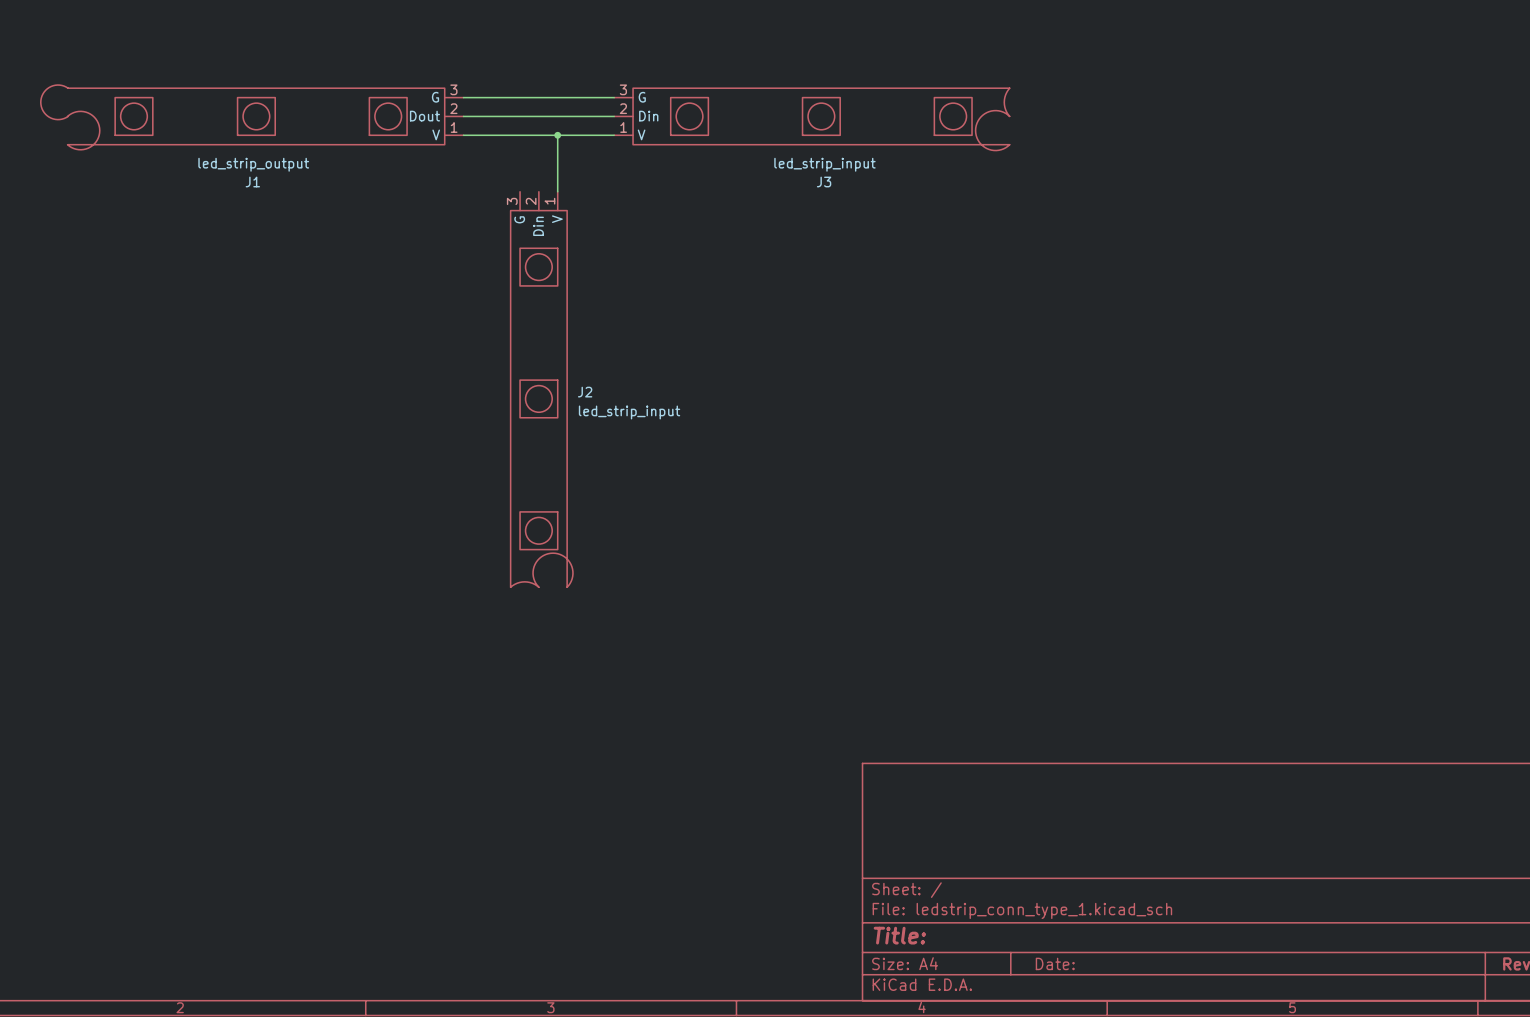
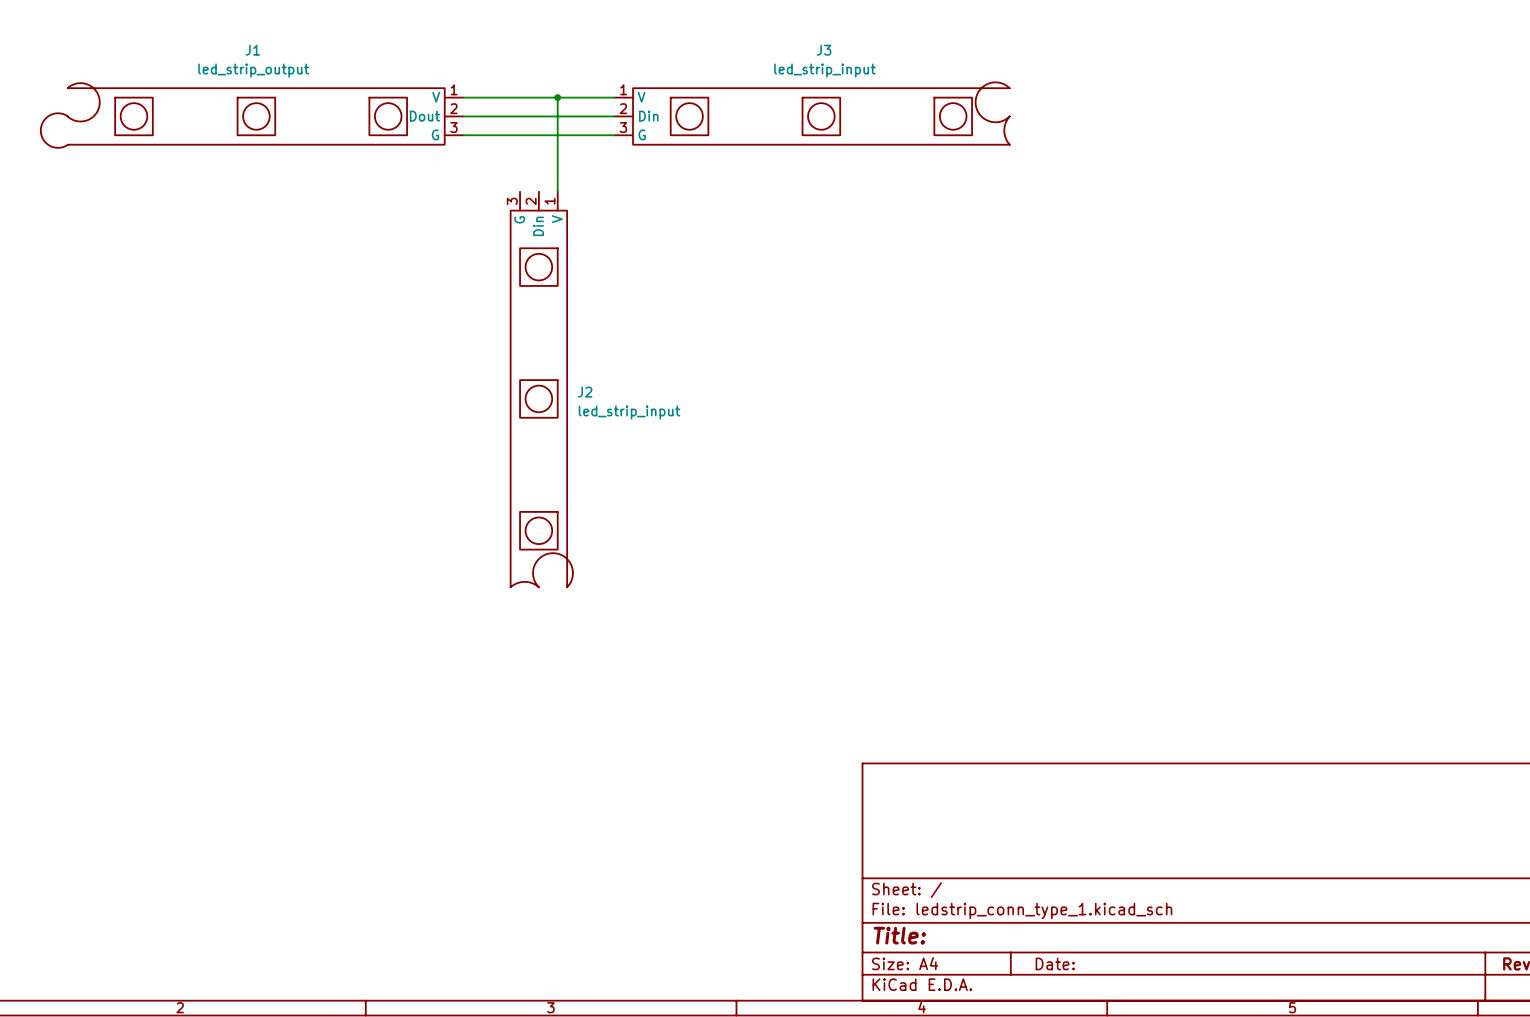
wire: none -> (557, 97) (557, 135)
J1 flip: as is (242, 117) -> up-down (242, 115)
J3 flip: as is (821, 119) -> up-down (821, 113)
junction position: (557, 135) -> (557, 97)

